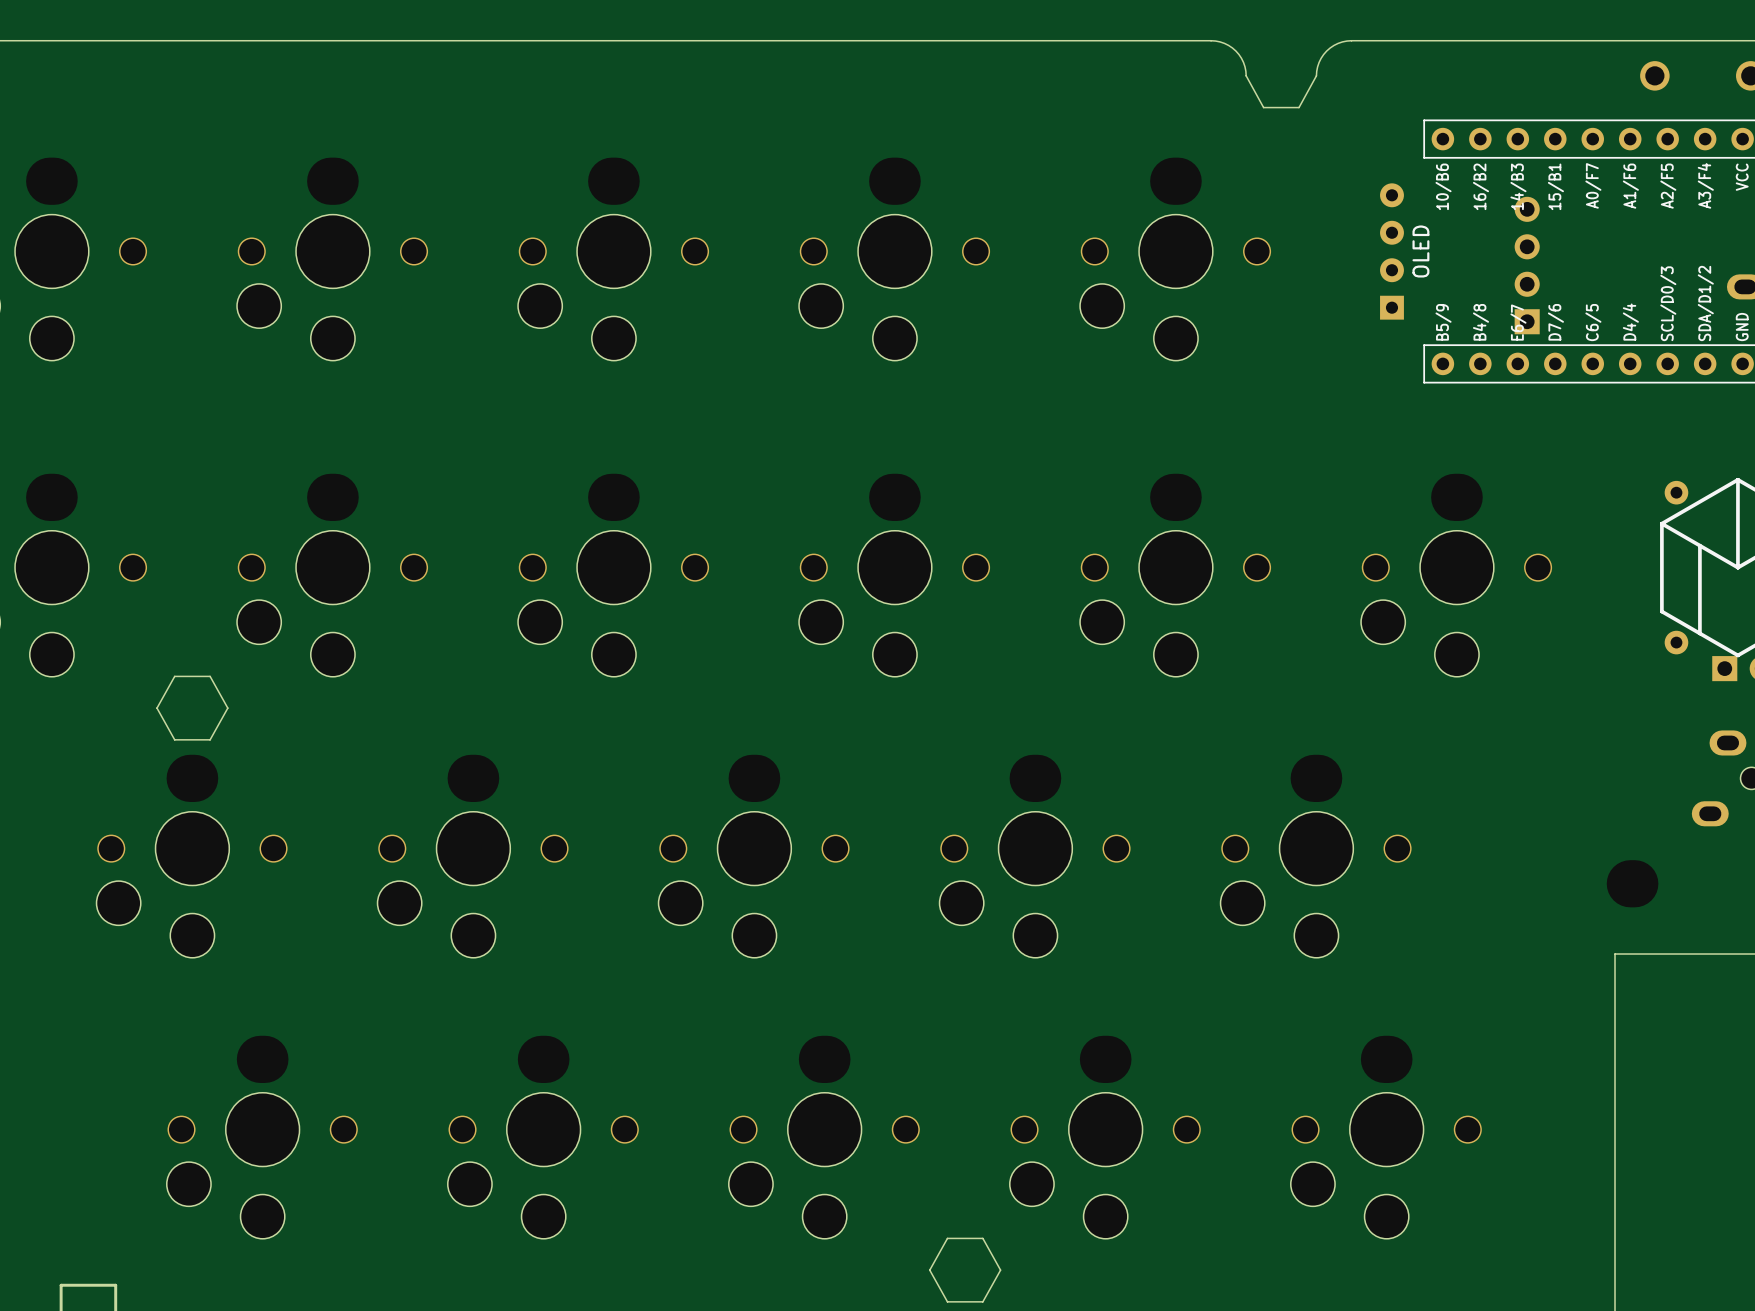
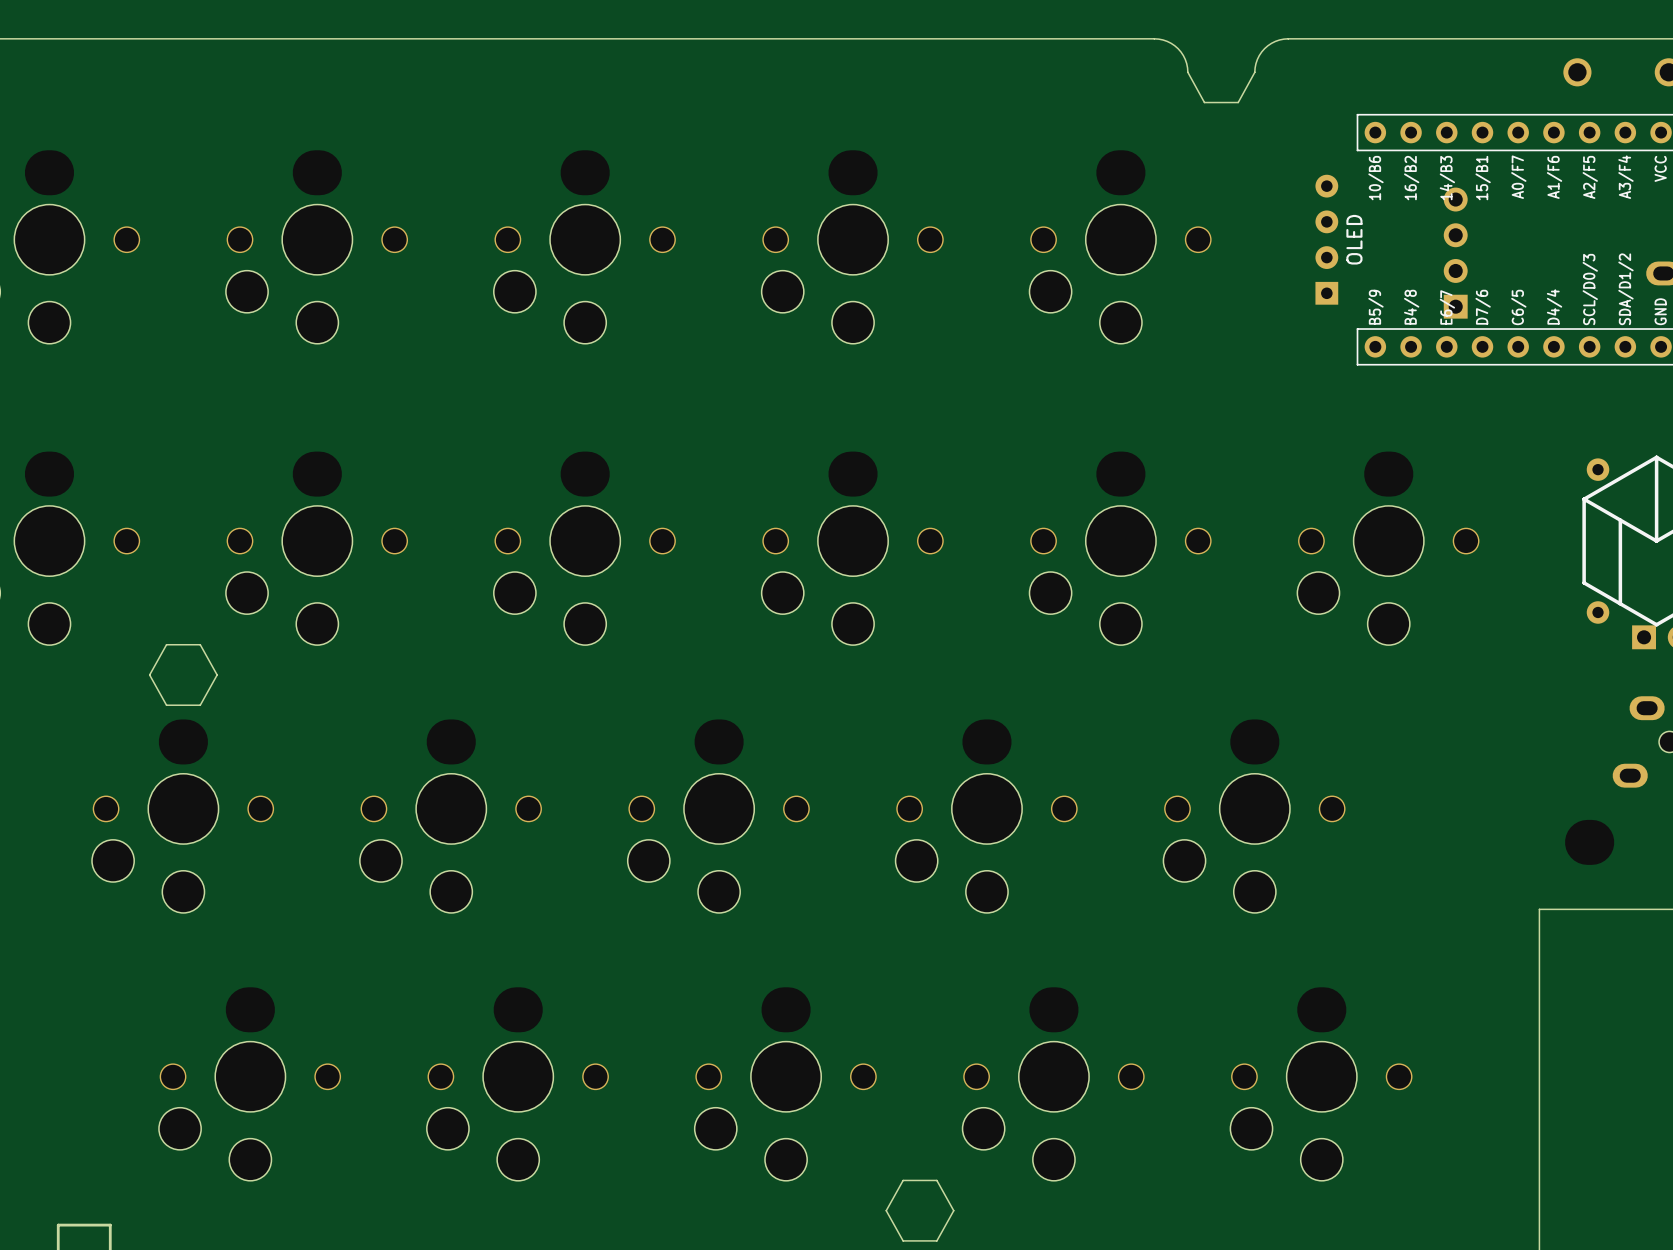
part position: (1632, 883) -> (1589, 842)

